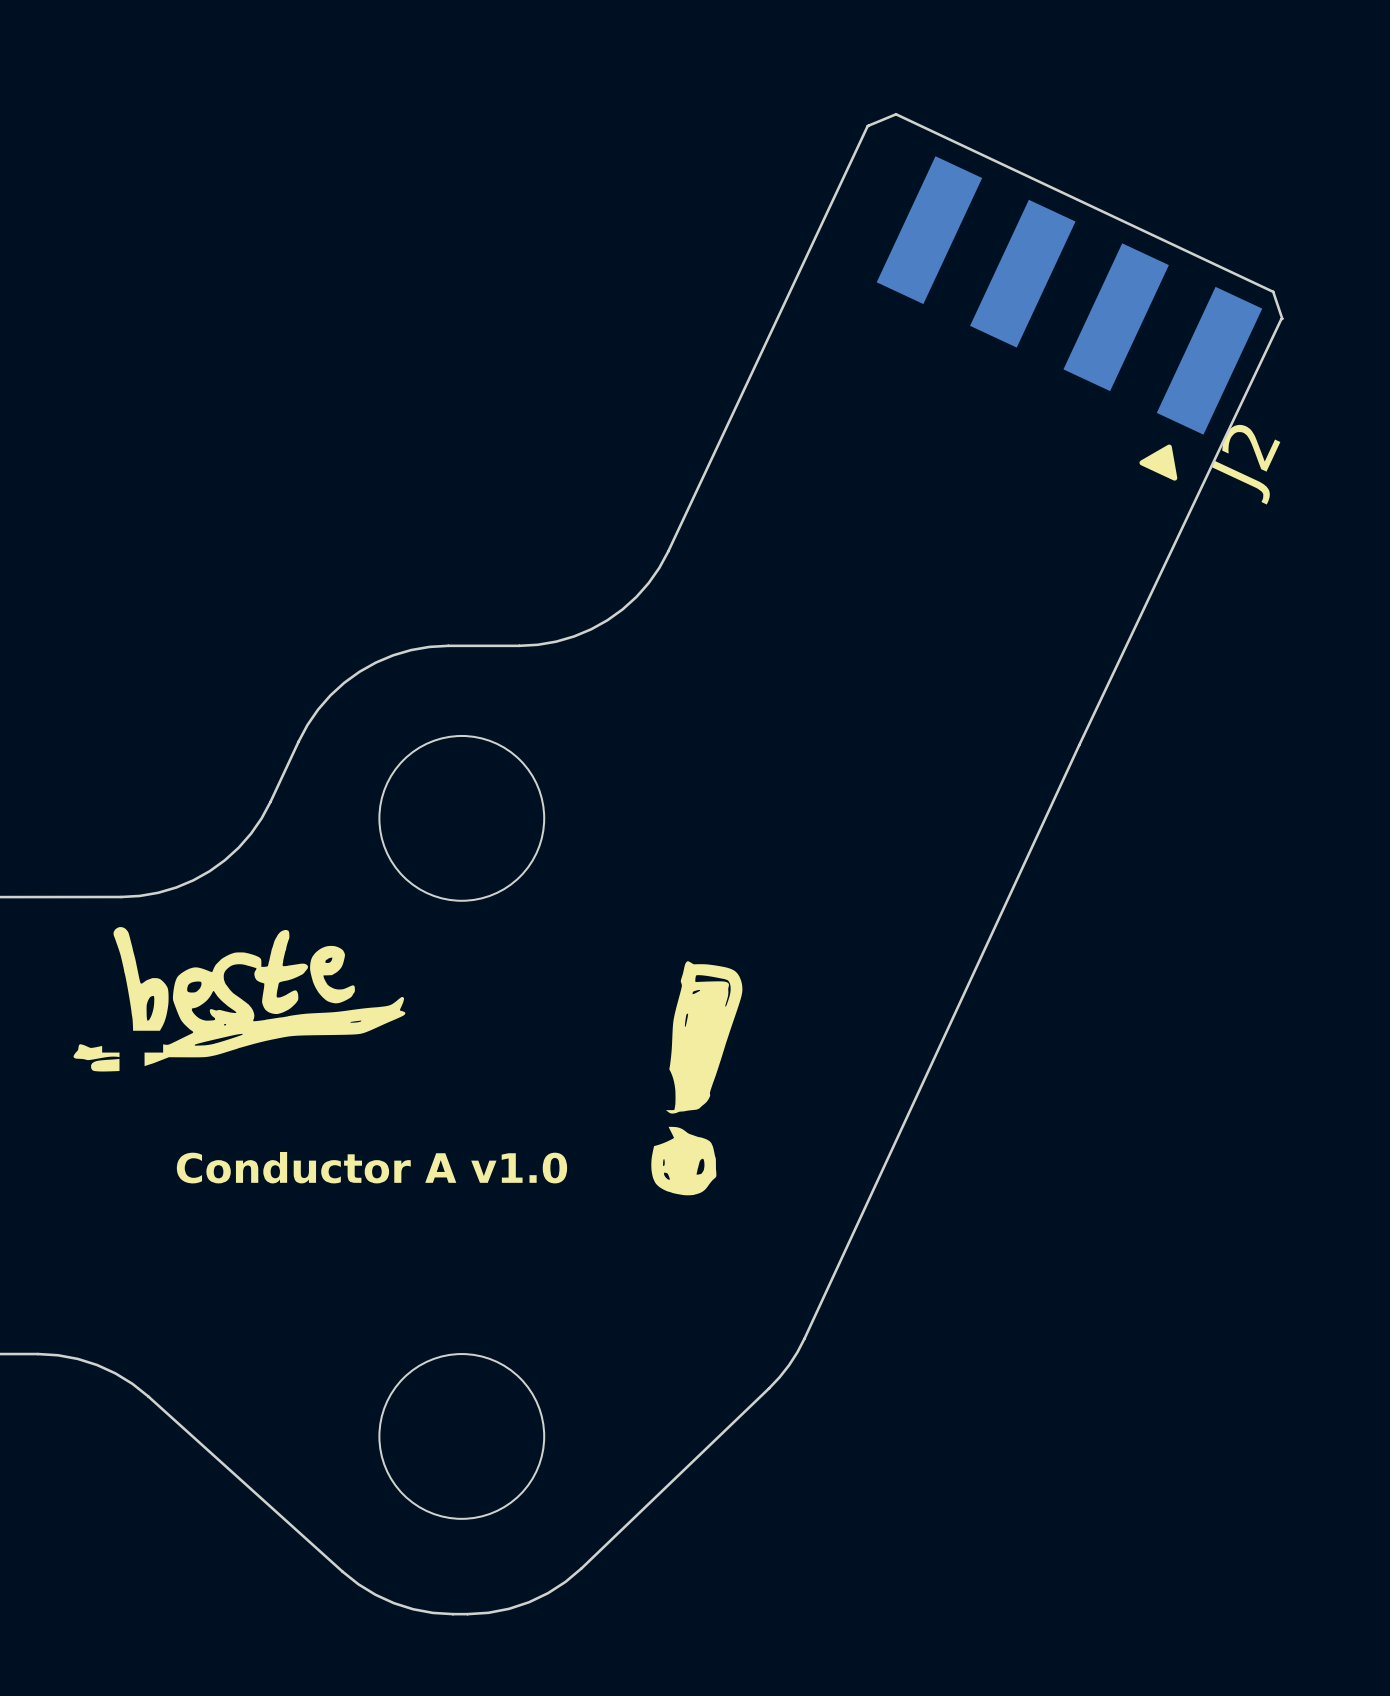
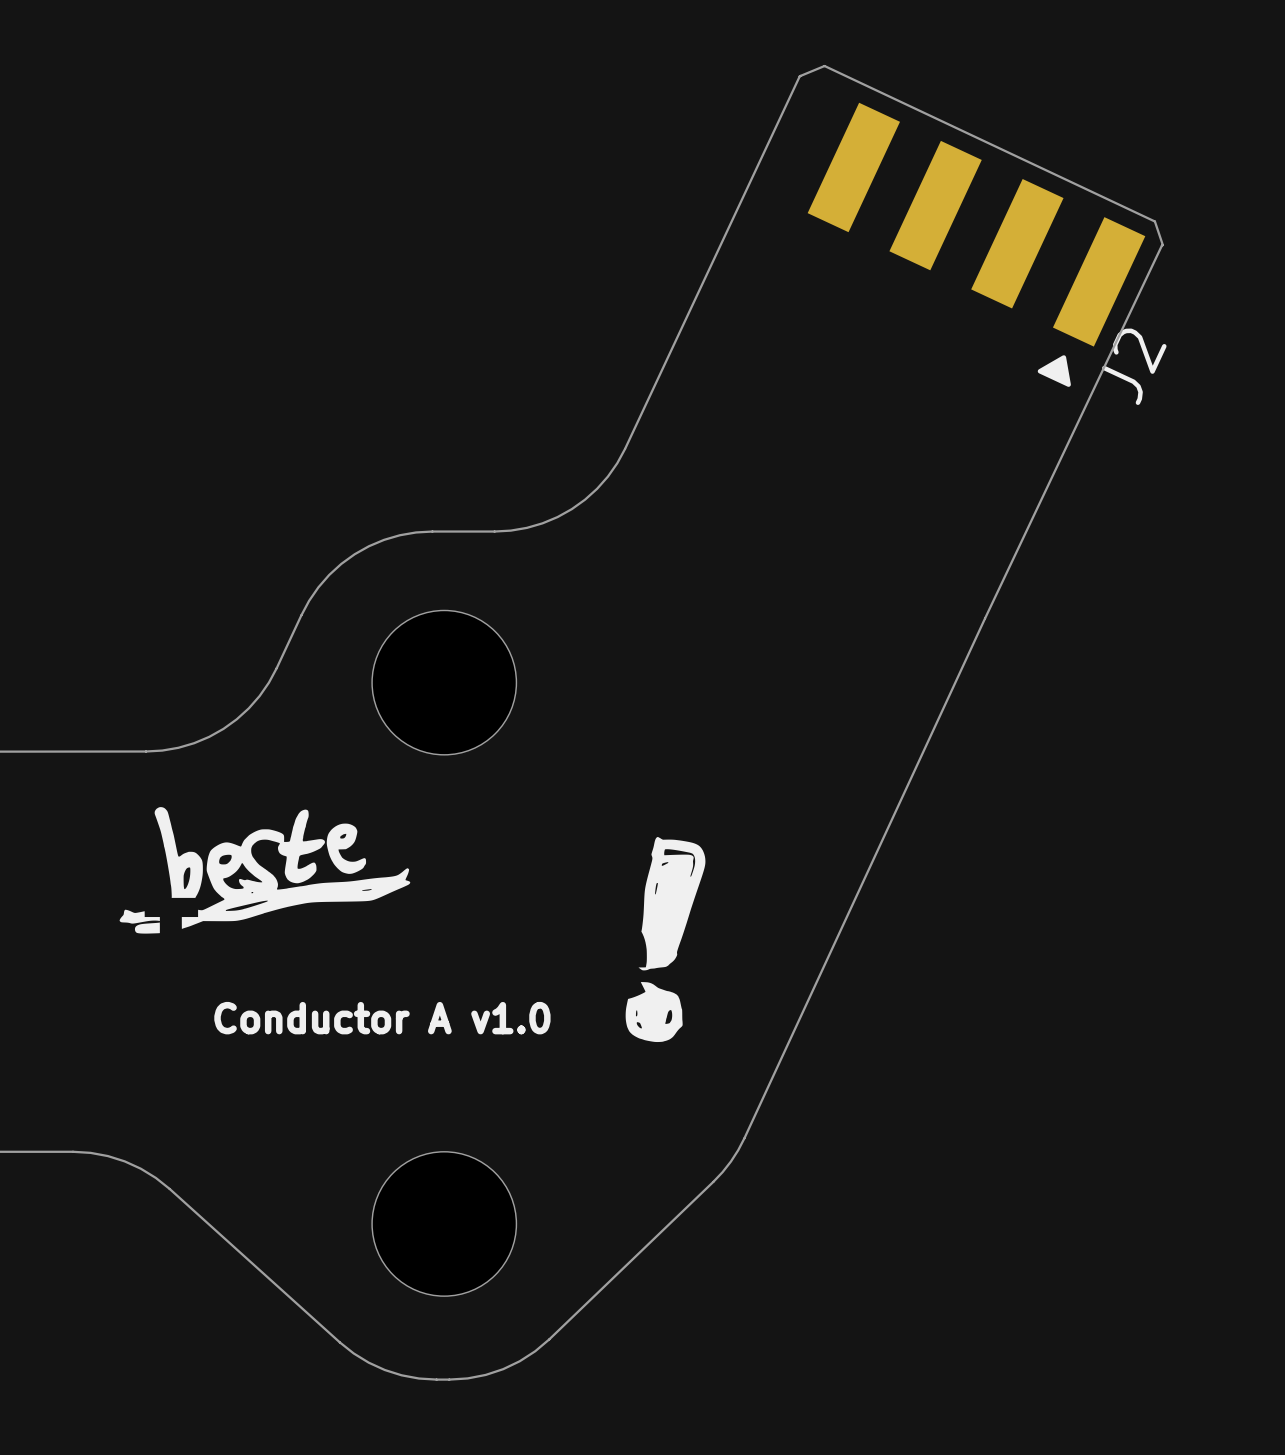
drawing position: (407, 1061) -> (412, 924)
text position: Conductor A v1.0 (371, 1167) -> Conductor A v1.0 (382, 1018)

